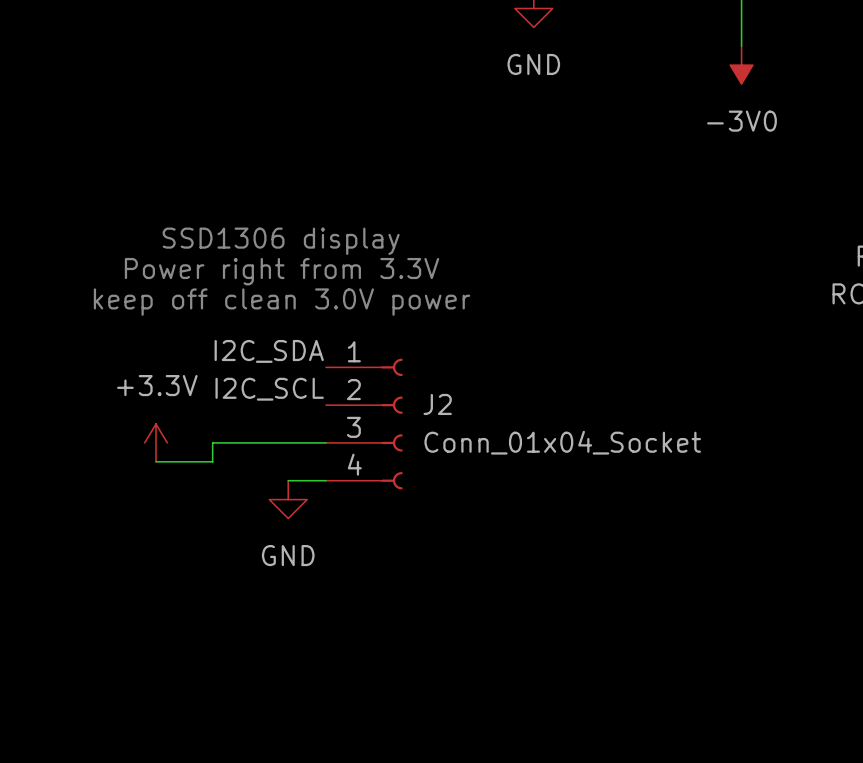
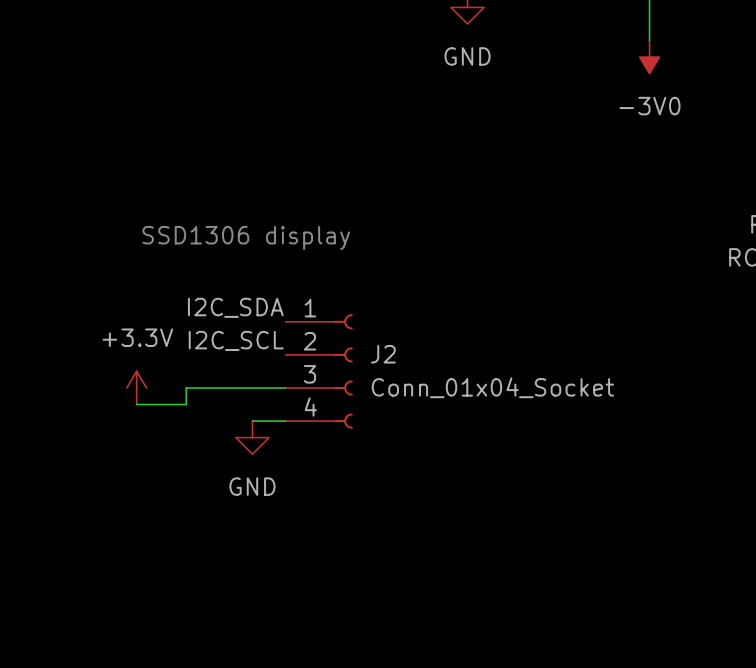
text: SSD1306 display (281, 241) -> none
text: Power right from 3.3V (282, 271) -> SSD1306 display (246, 237)
text: keep off clean 3.0V power (282, 302) -> none

